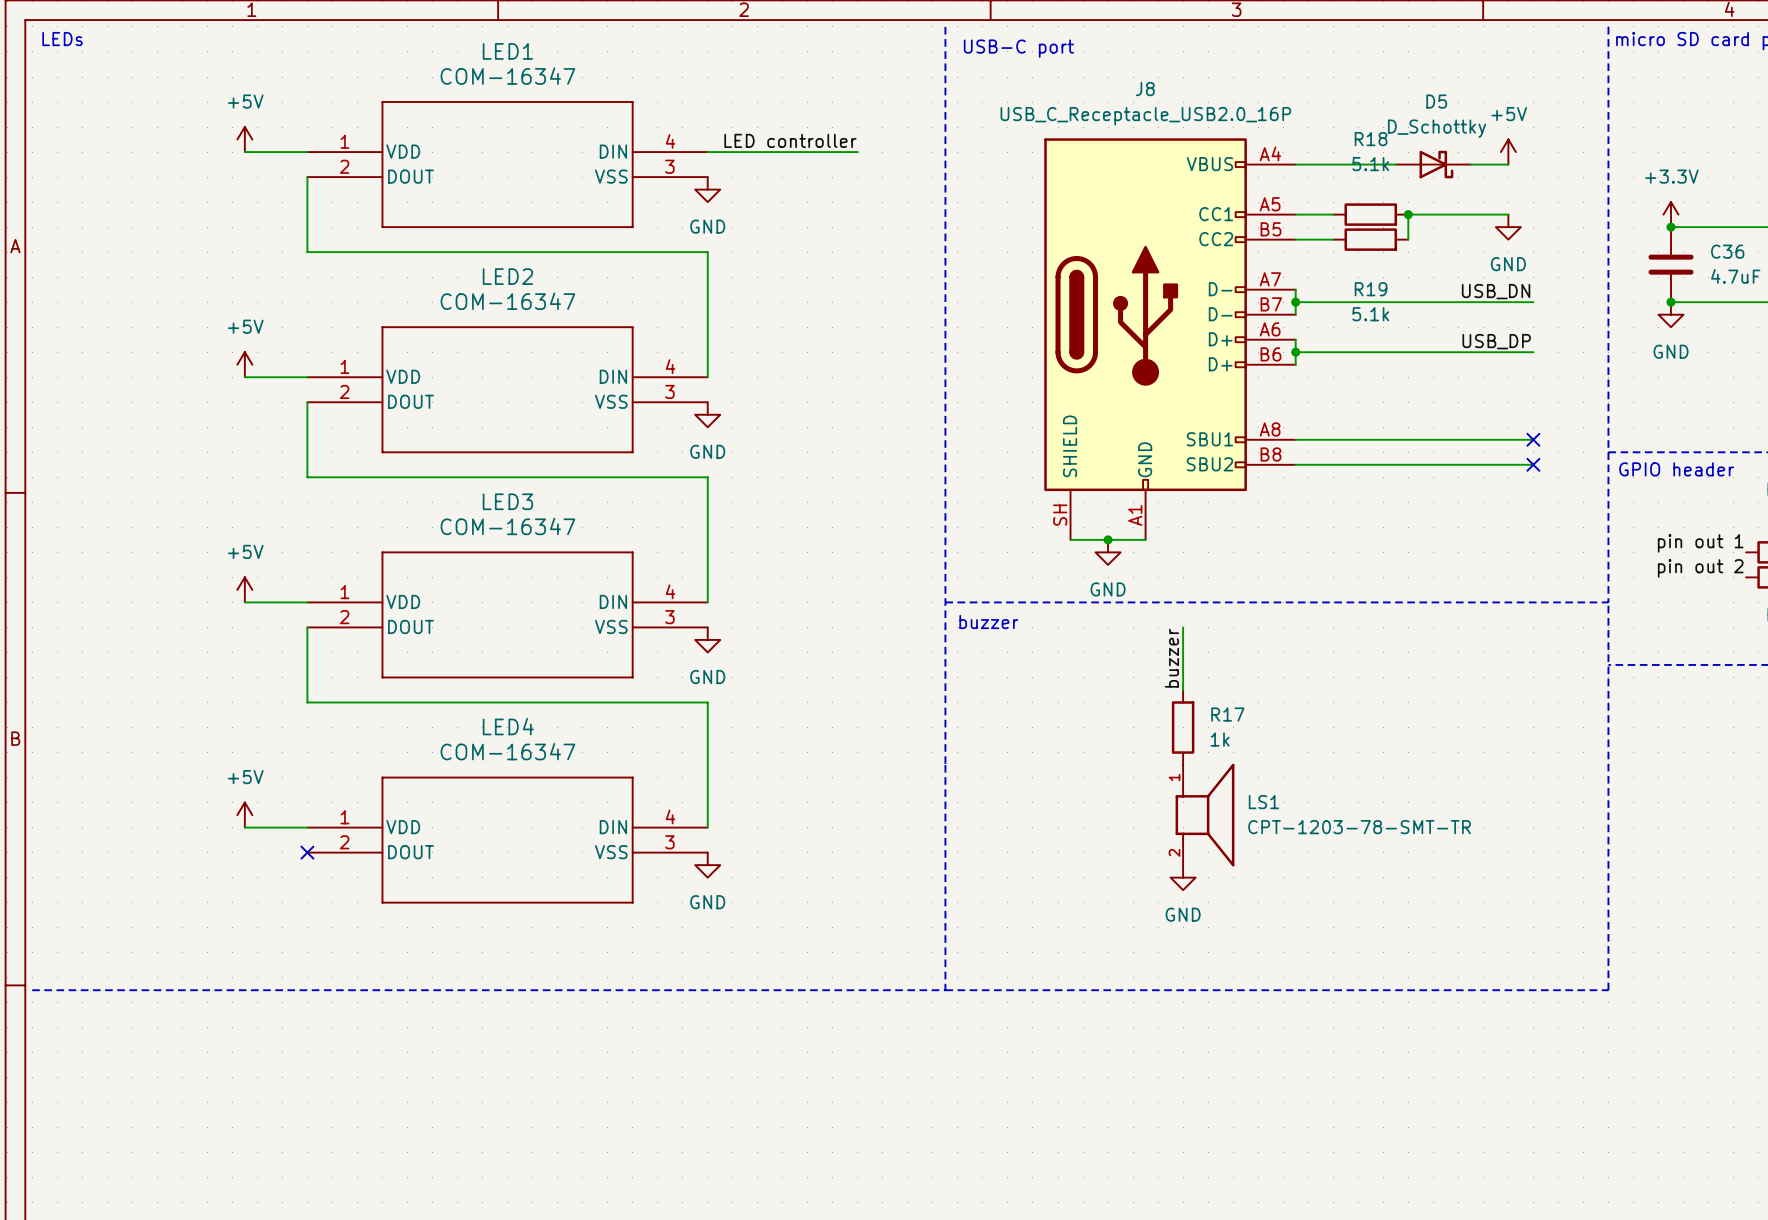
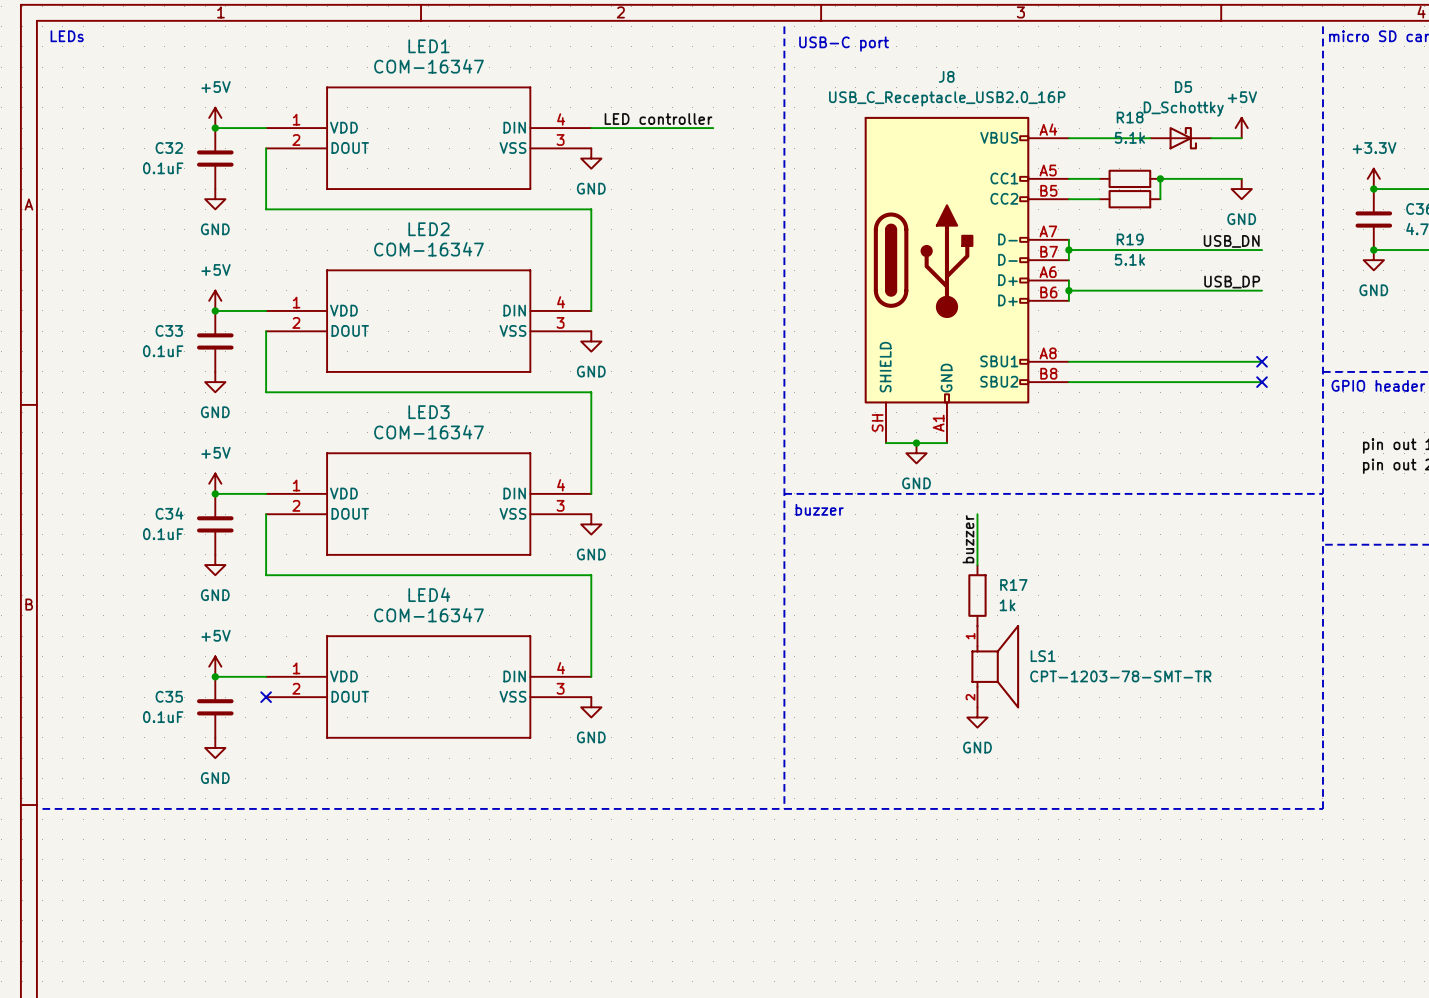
junction: none -> (215, 128)
C32: none -> 0.1uF (215, 158)
power symbol: none -> GND (215, 199)
junction: none -> (215, 310)
C33: none -> 0.1uF (215, 341)
power symbol: none -> GND (215, 382)
junction: none -> (215, 493)
C34: none -> 0.1uF (215, 524)
power symbol: none -> GND (215, 565)
junction: none -> (215, 676)
C35: none -> 0.1uF (215, 707)
power symbol: none -> GND (215, 747)

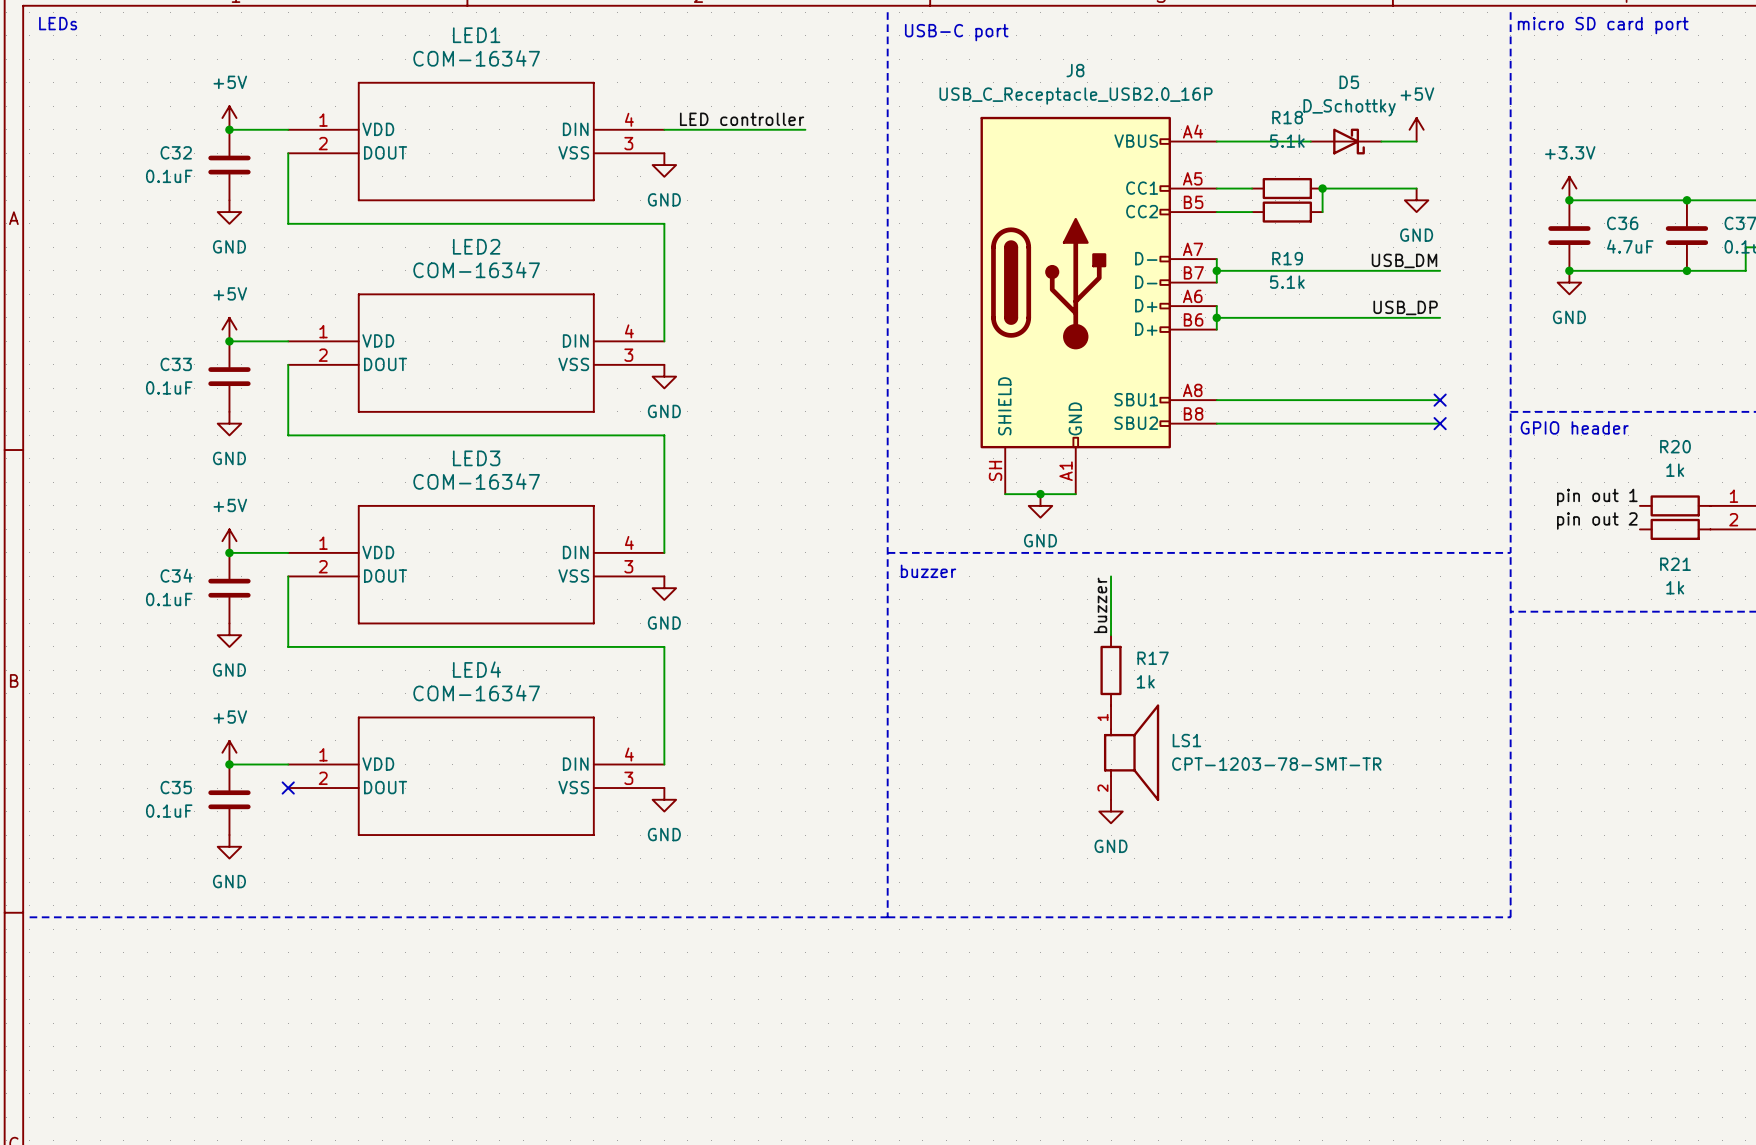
label: USB_DN (1231, 241) -> USB_DM (1404, 260)

